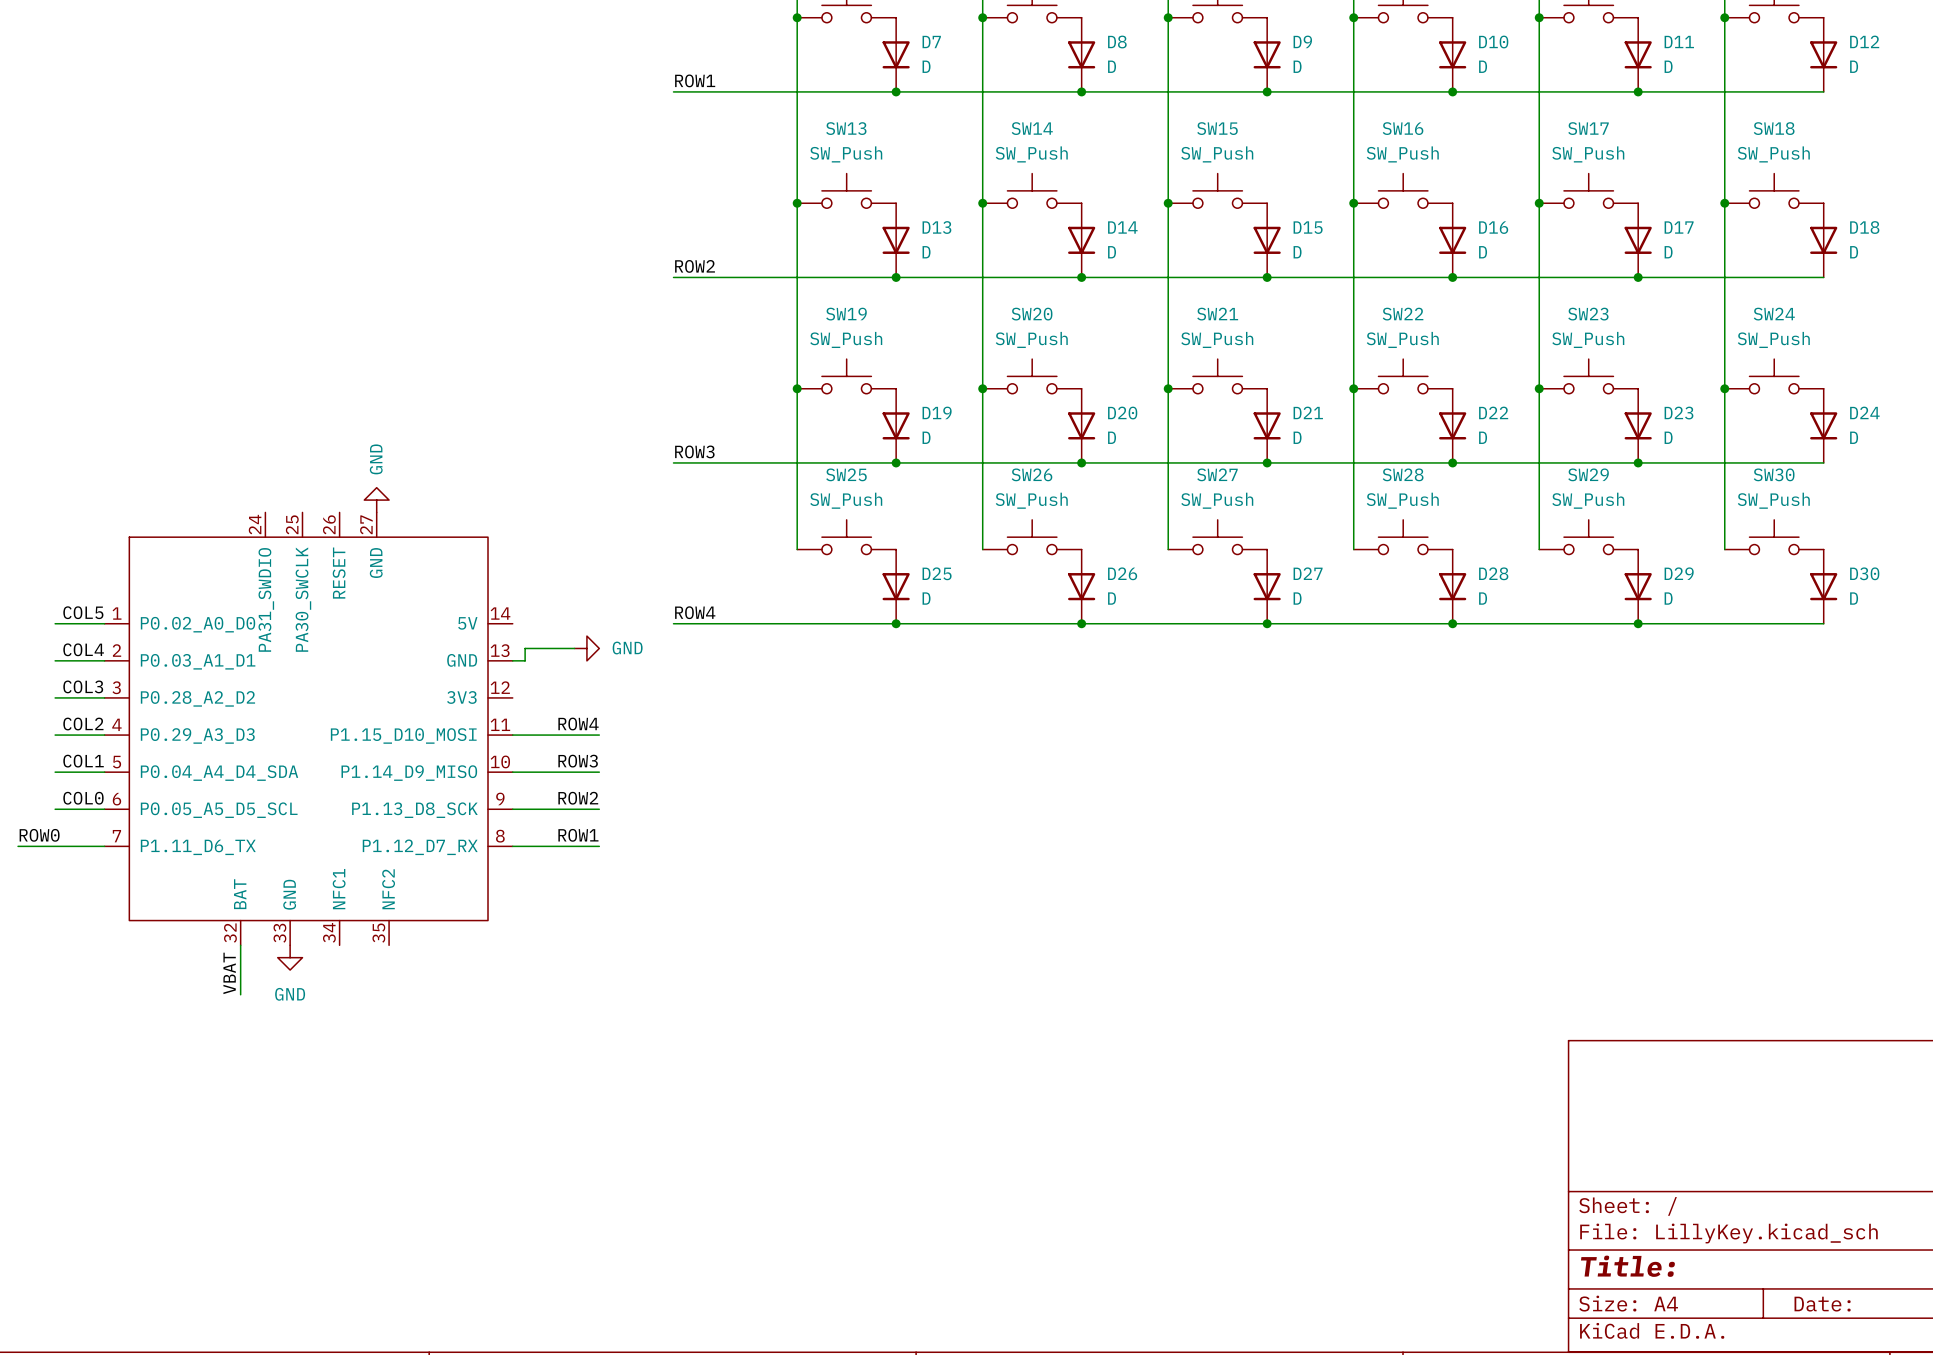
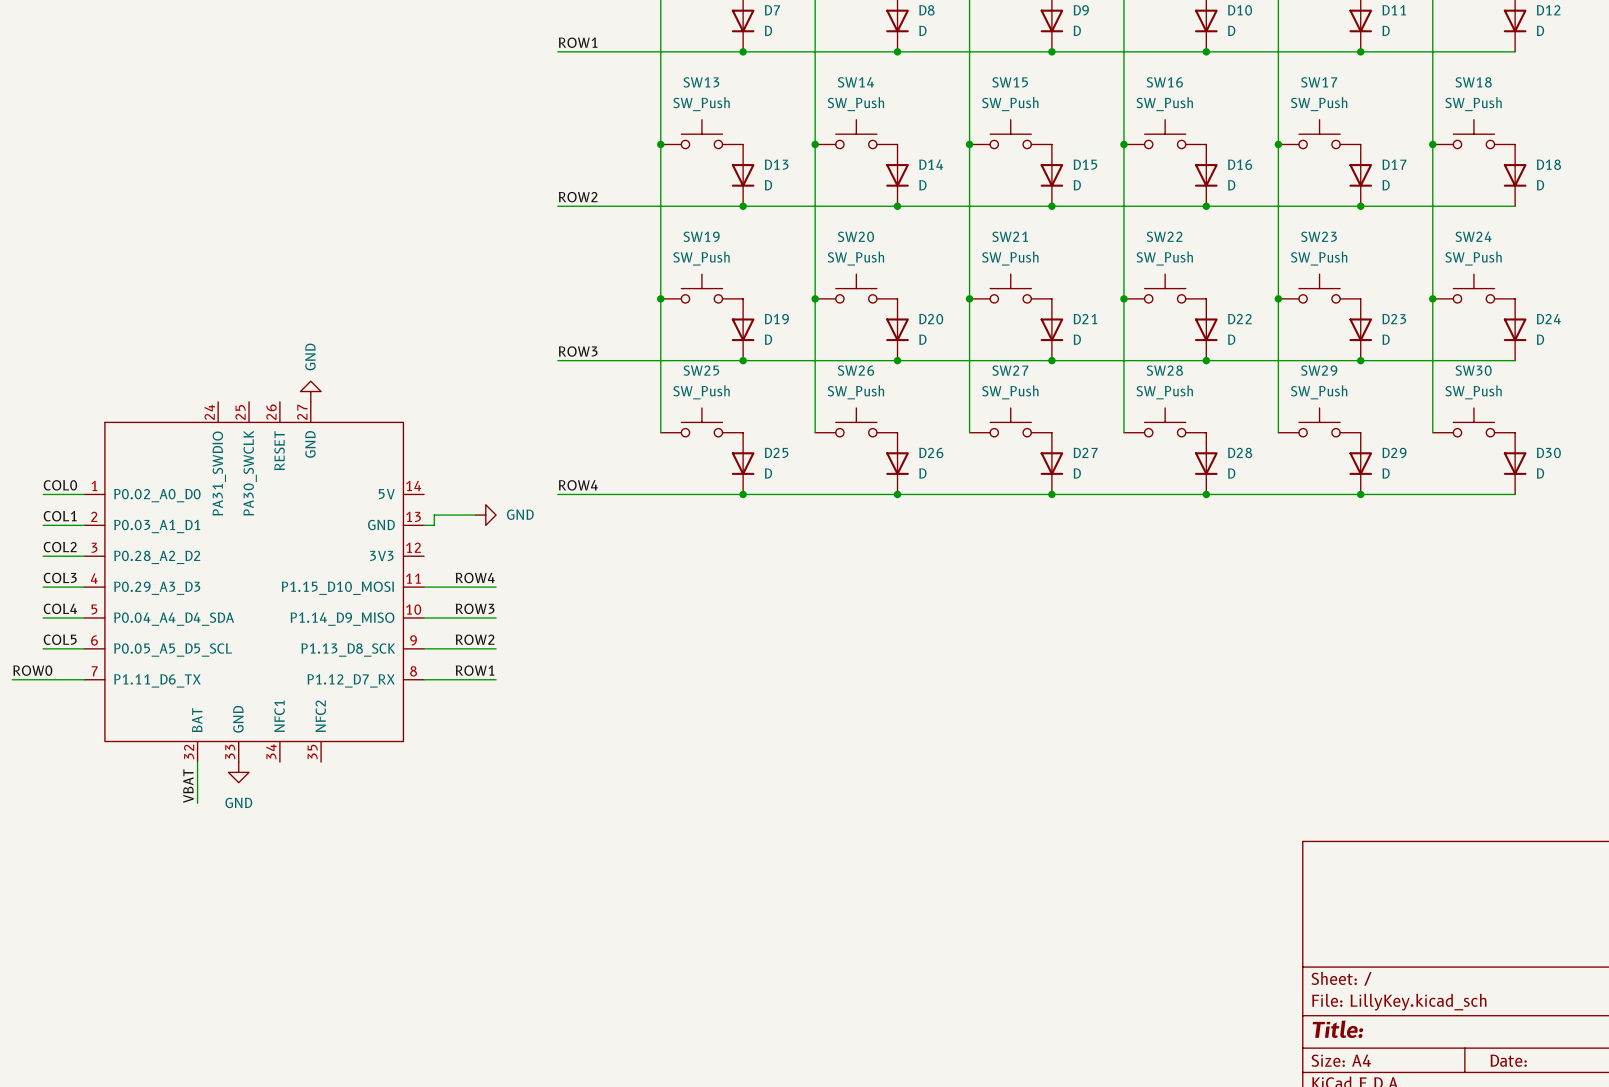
label position: COL5 (83, 612) -> COL5 (60, 639)
label position: COL4 (83, 649) -> COL4 (60, 608)
label position: COL3 (83, 686) -> COL3 (60, 577)
label position: COL2 (83, 724) -> COL2 (60, 547)
label position: COL1 (83, 761) -> COL1 (60, 516)
label position: COL0 (83, 798) -> COL0 (60, 485)

